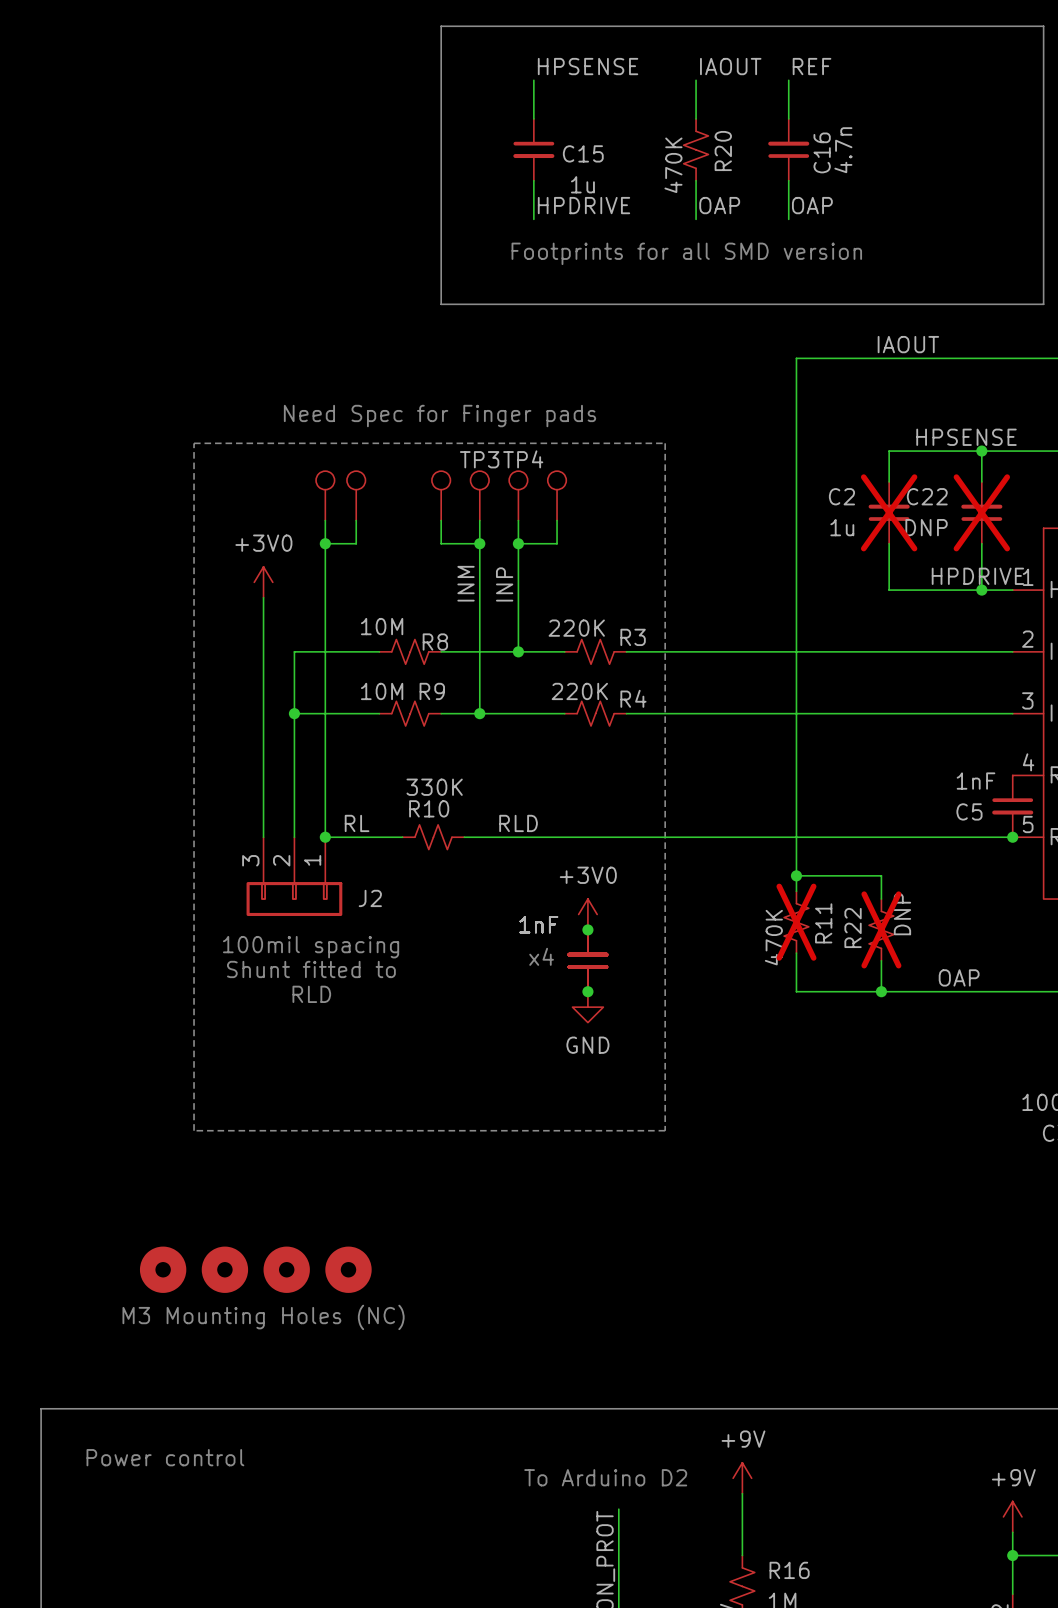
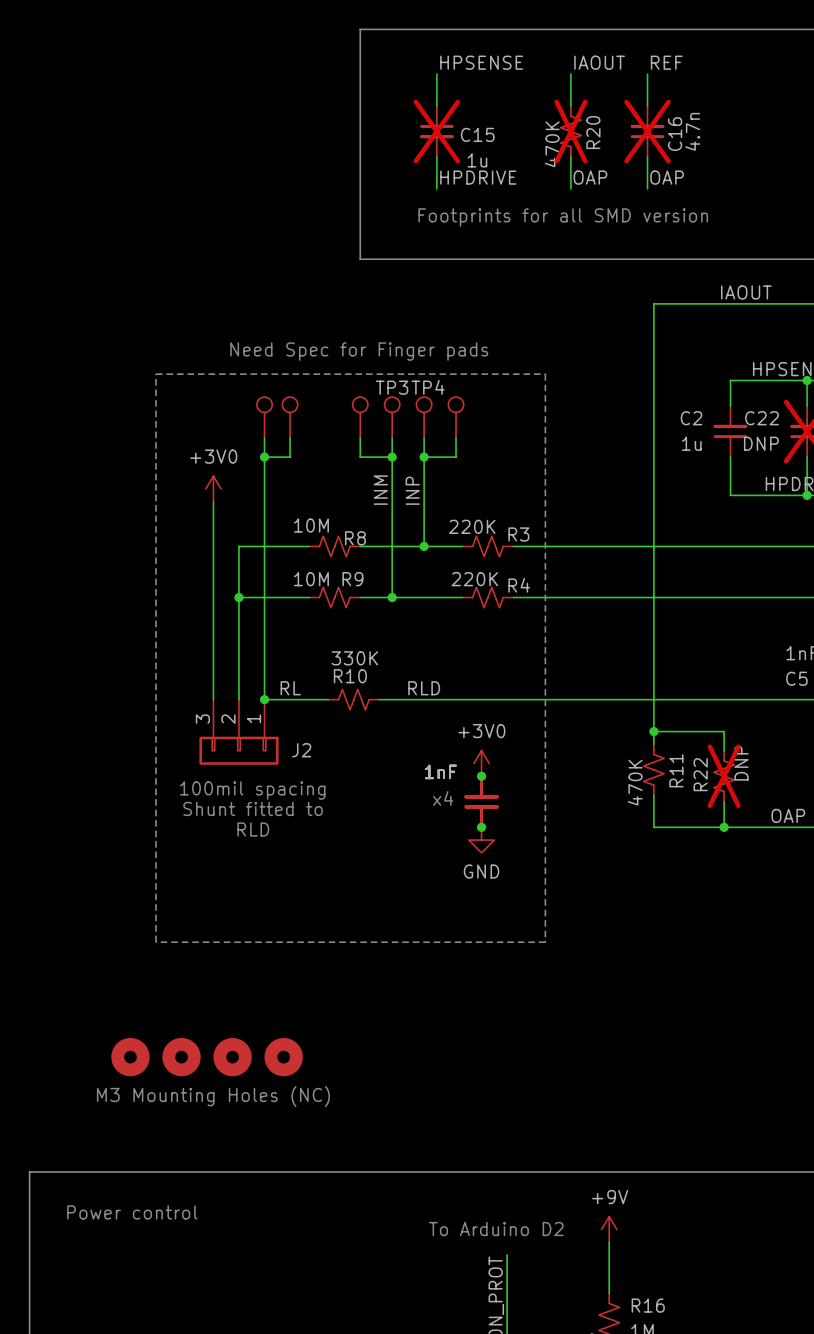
C15 do-not-place cross: none -> (436, 131)
R20 do-not-place cross: none -> (570, 131)
C16 do-not-place cross: none -> (647, 131)
C2 do-not-place cross: (889, 512) -> none
R11 do-not-place cross: (796, 922) -> none

